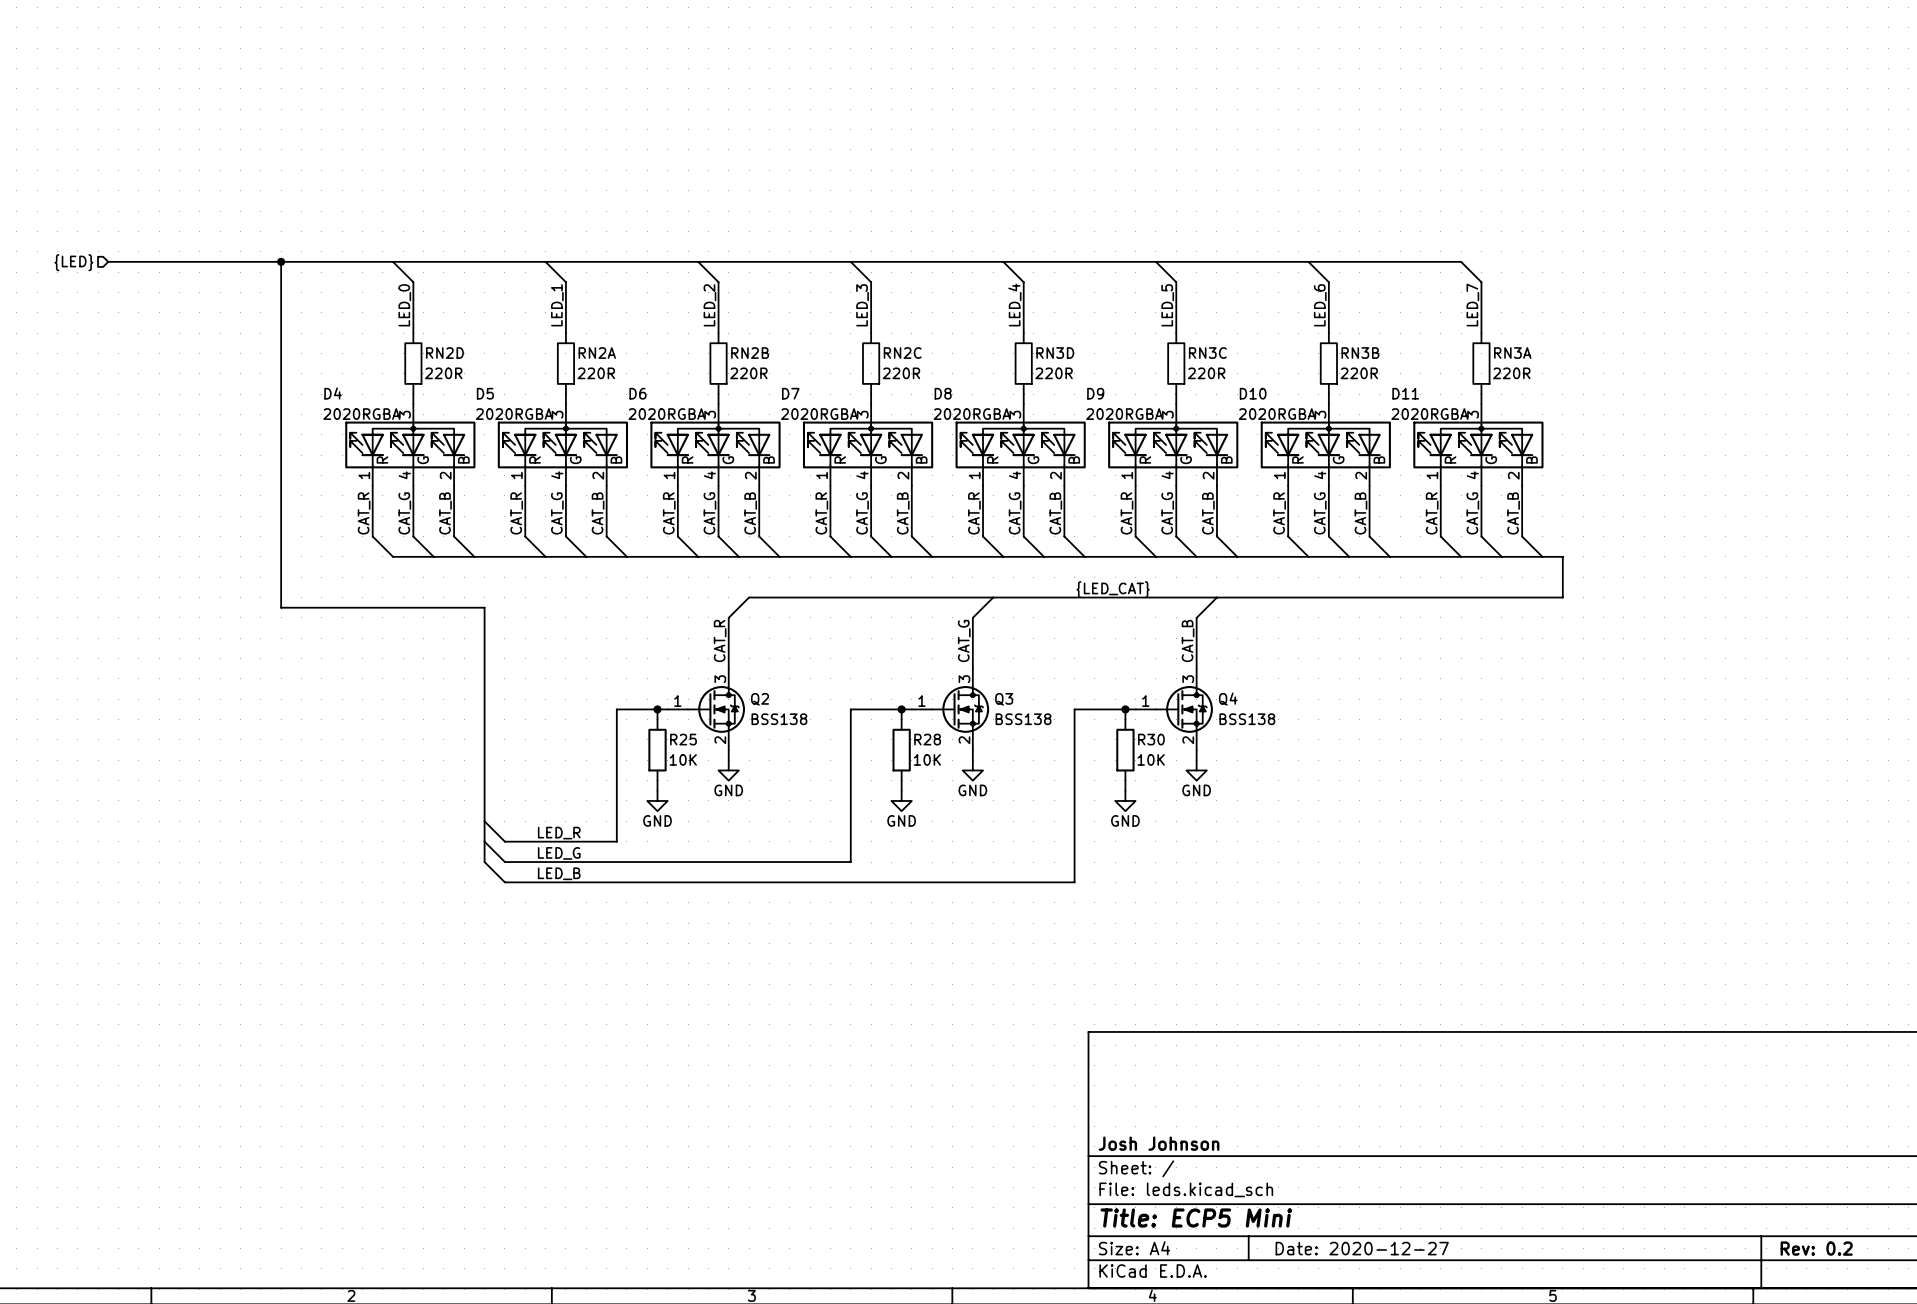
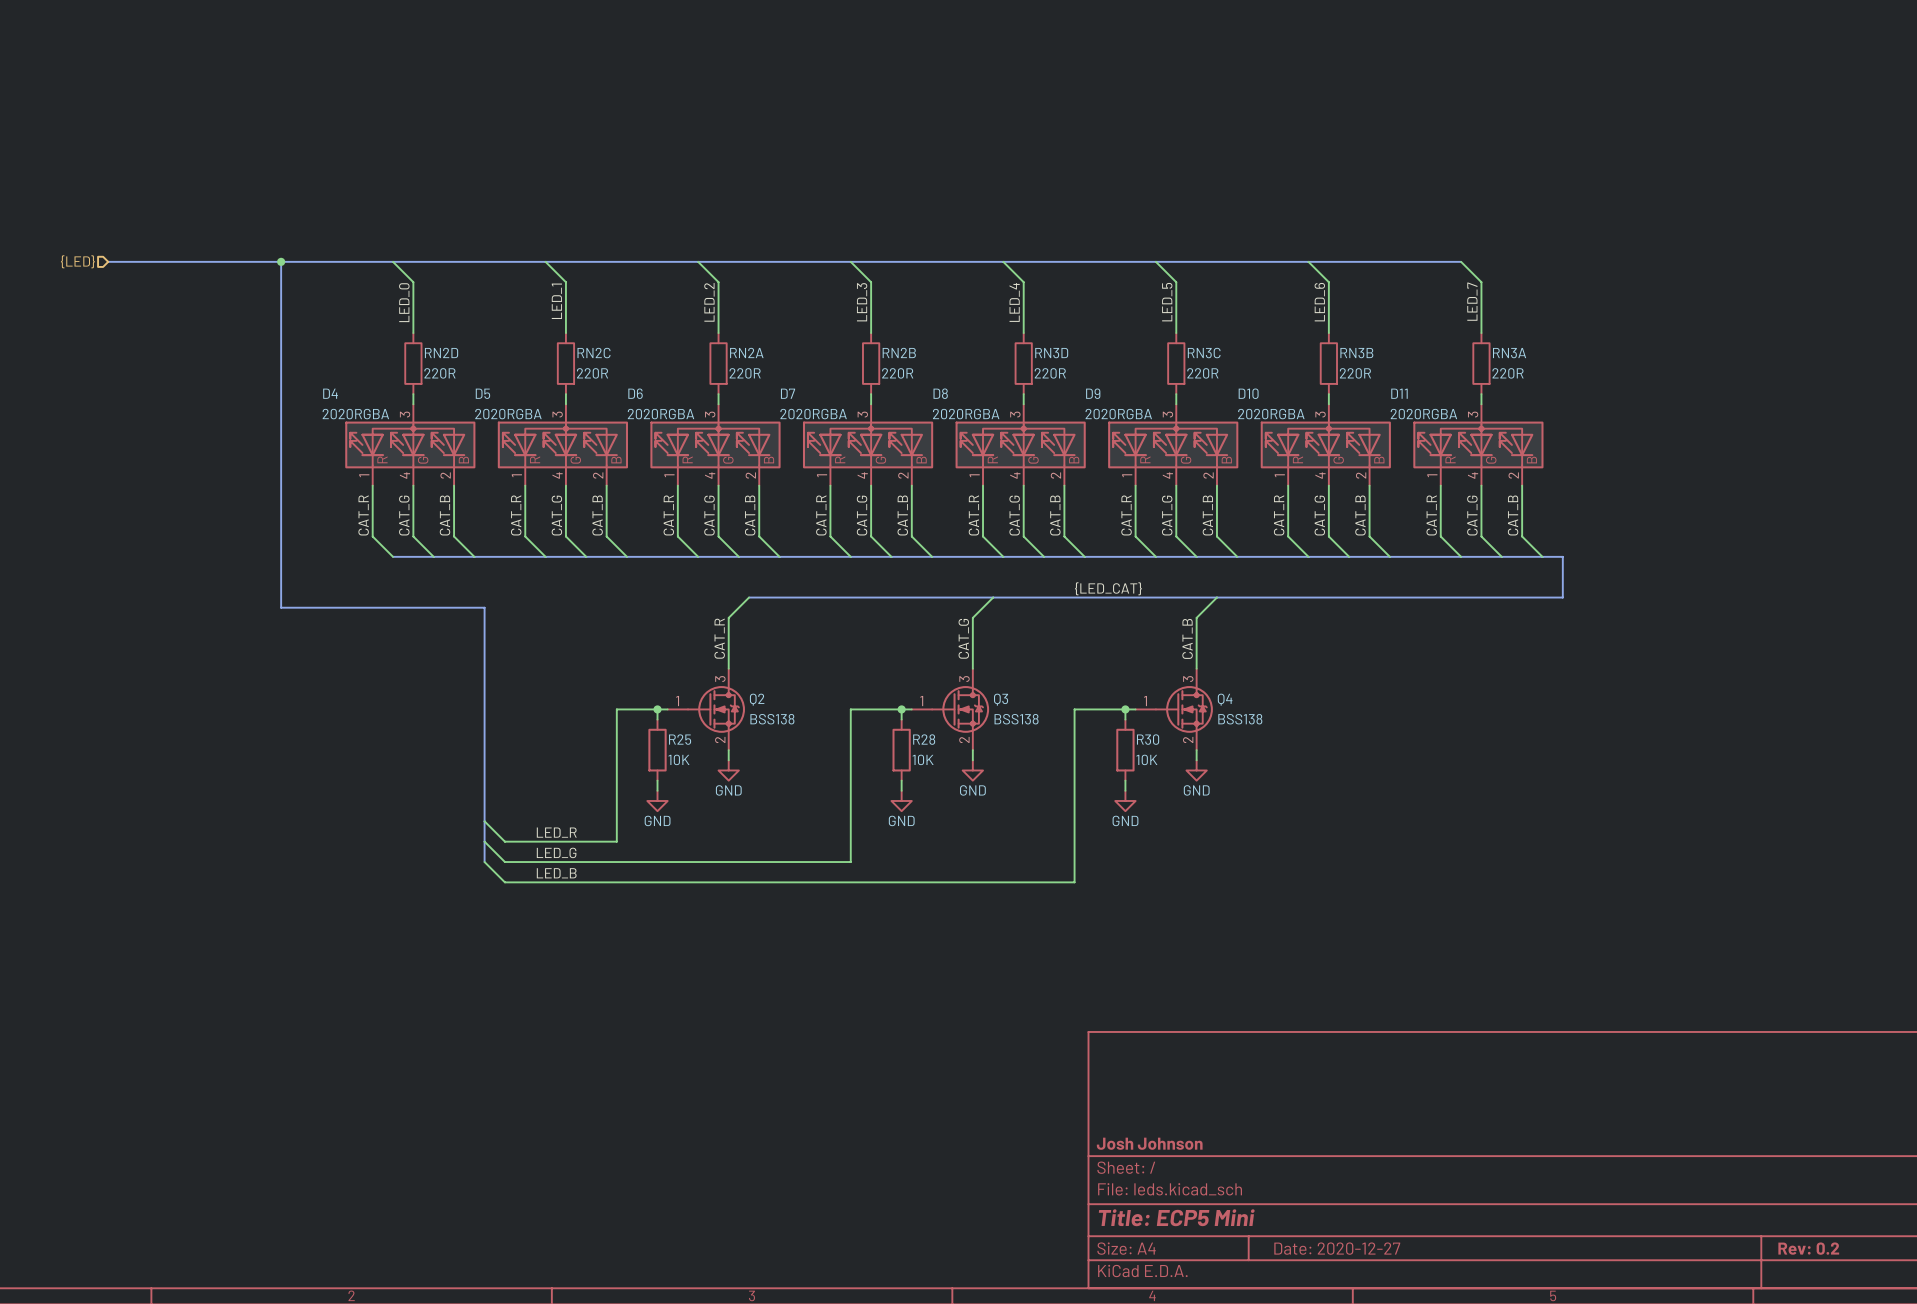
RN2A name: RN2A (597, 353) -> RN2C (594, 353)
RN2B name: RN2B (750, 353) -> RN2A (746, 352)
RN2C name: RN2C (902, 353) -> RN2B (899, 352)

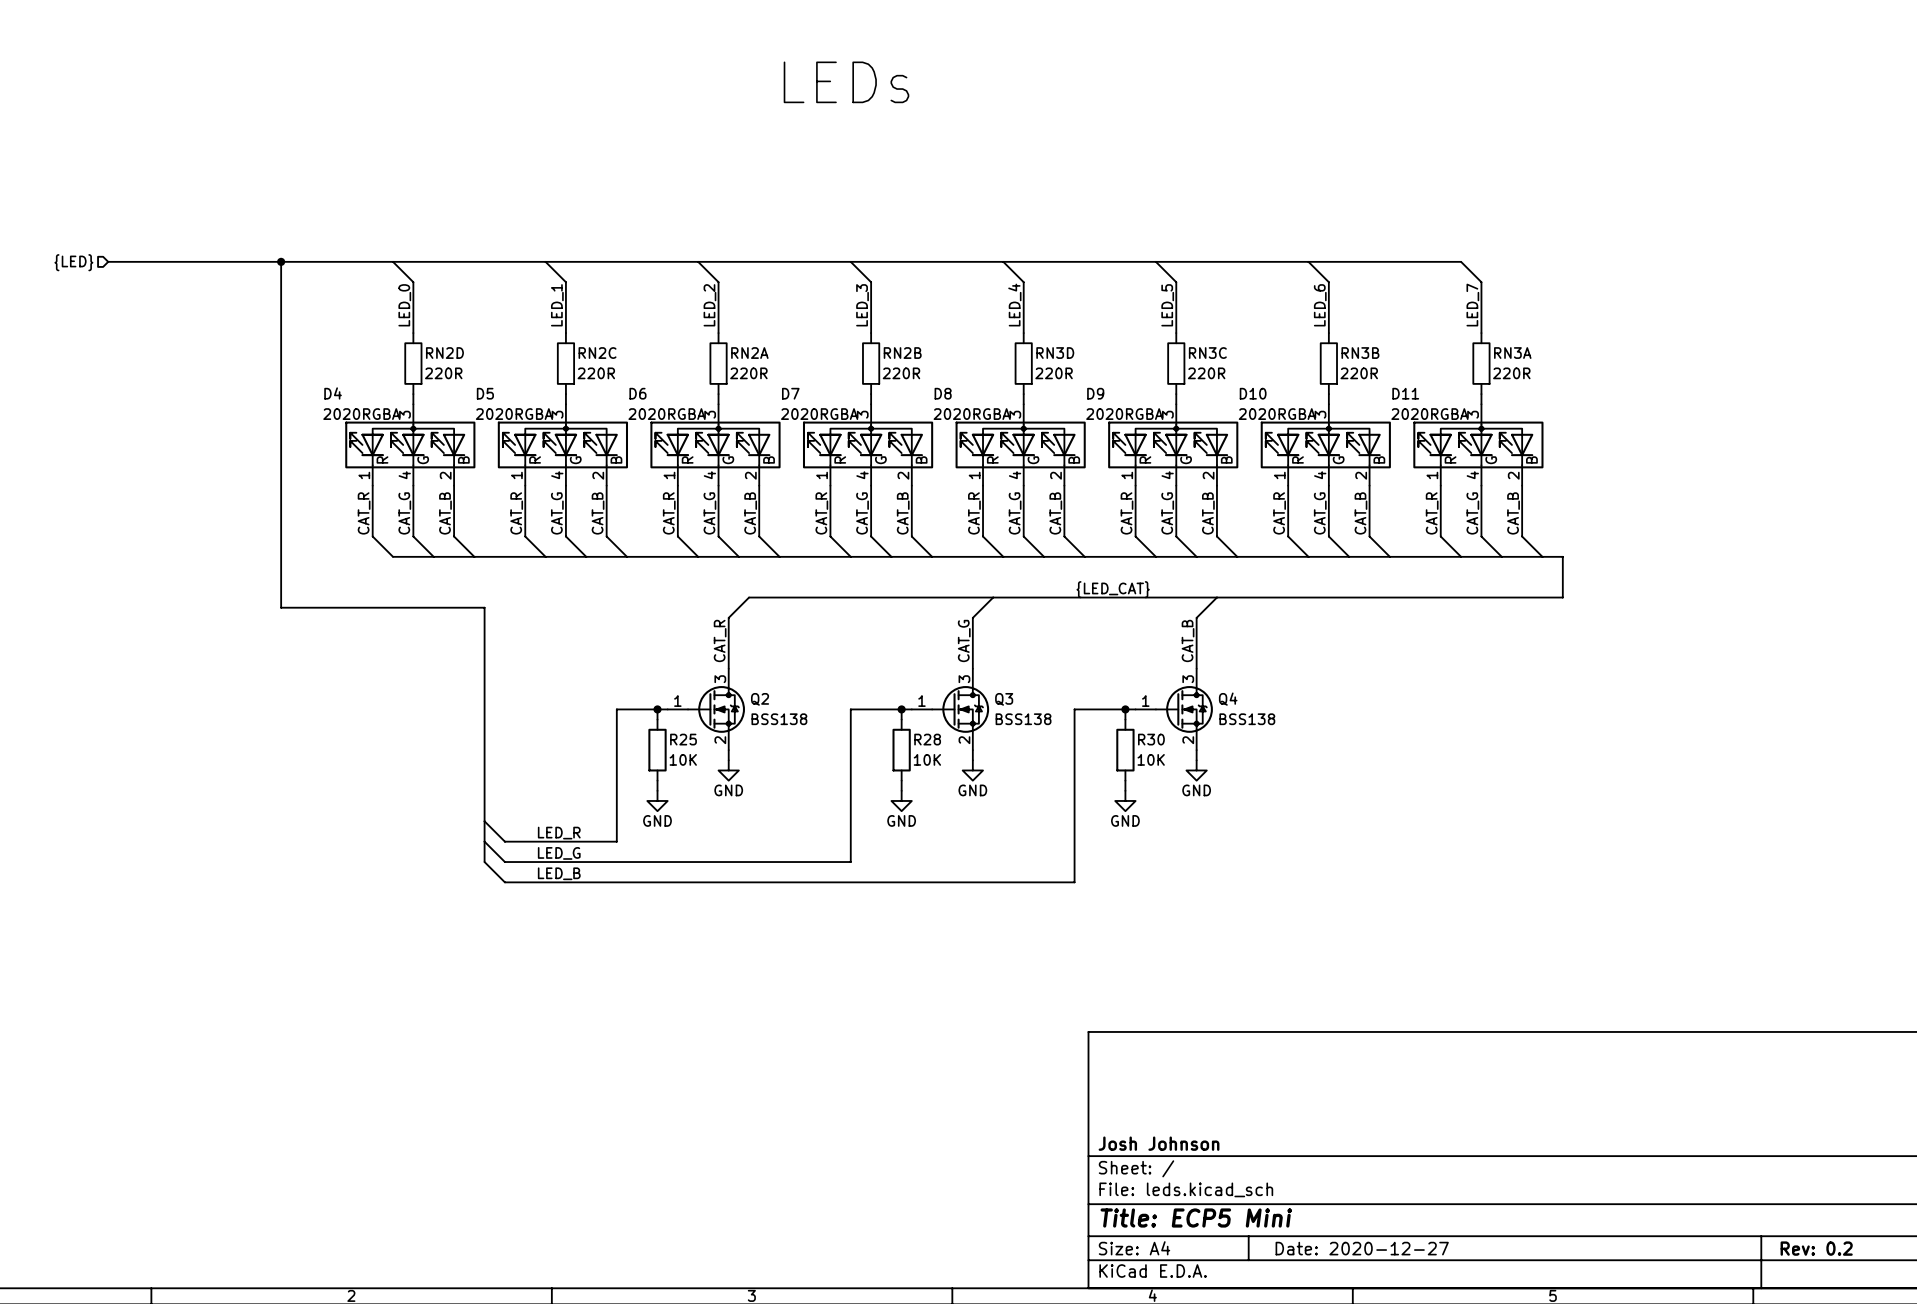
text: none -> LEDs (846, 82)

